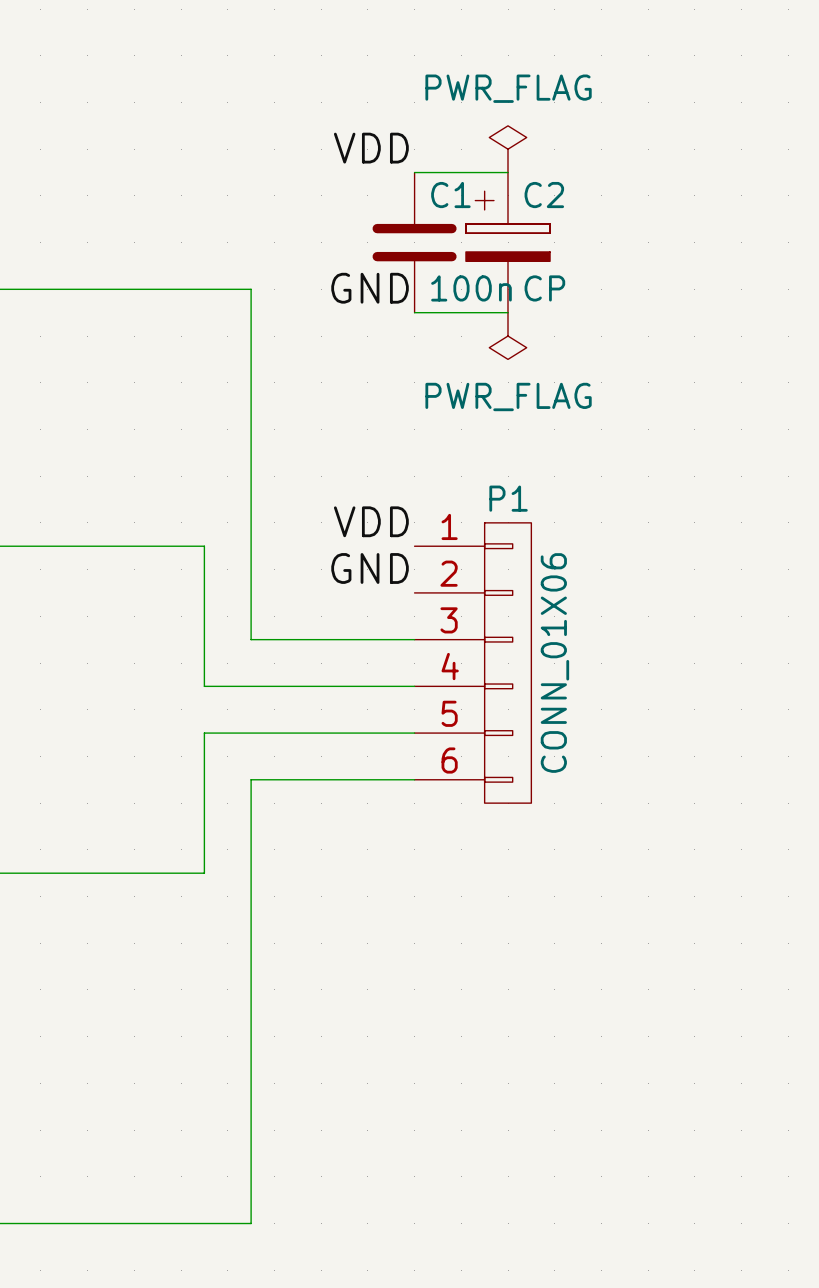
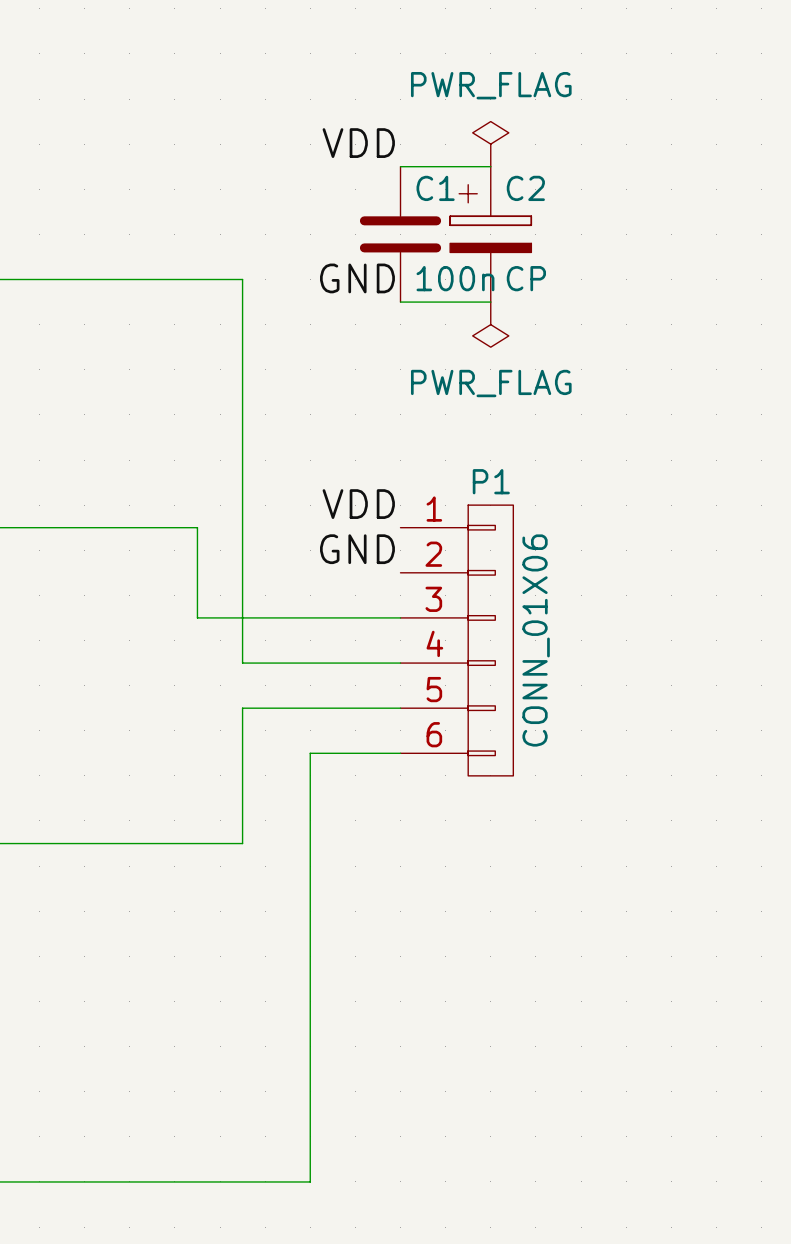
wire: (204, 639) (204, 686) (251, 686) -> (197, 617) (242, 617) (242, 663)
wire: (251, 733) (204, 733) (204, 873) -> (242, 843) (197, 843)
wire: (251, 779) (321, 779) -> (242, 753) (242, 708)
wire: (251, 873) (251, 1223) -> (310, 753) (310, 1181) (242, 1181)

